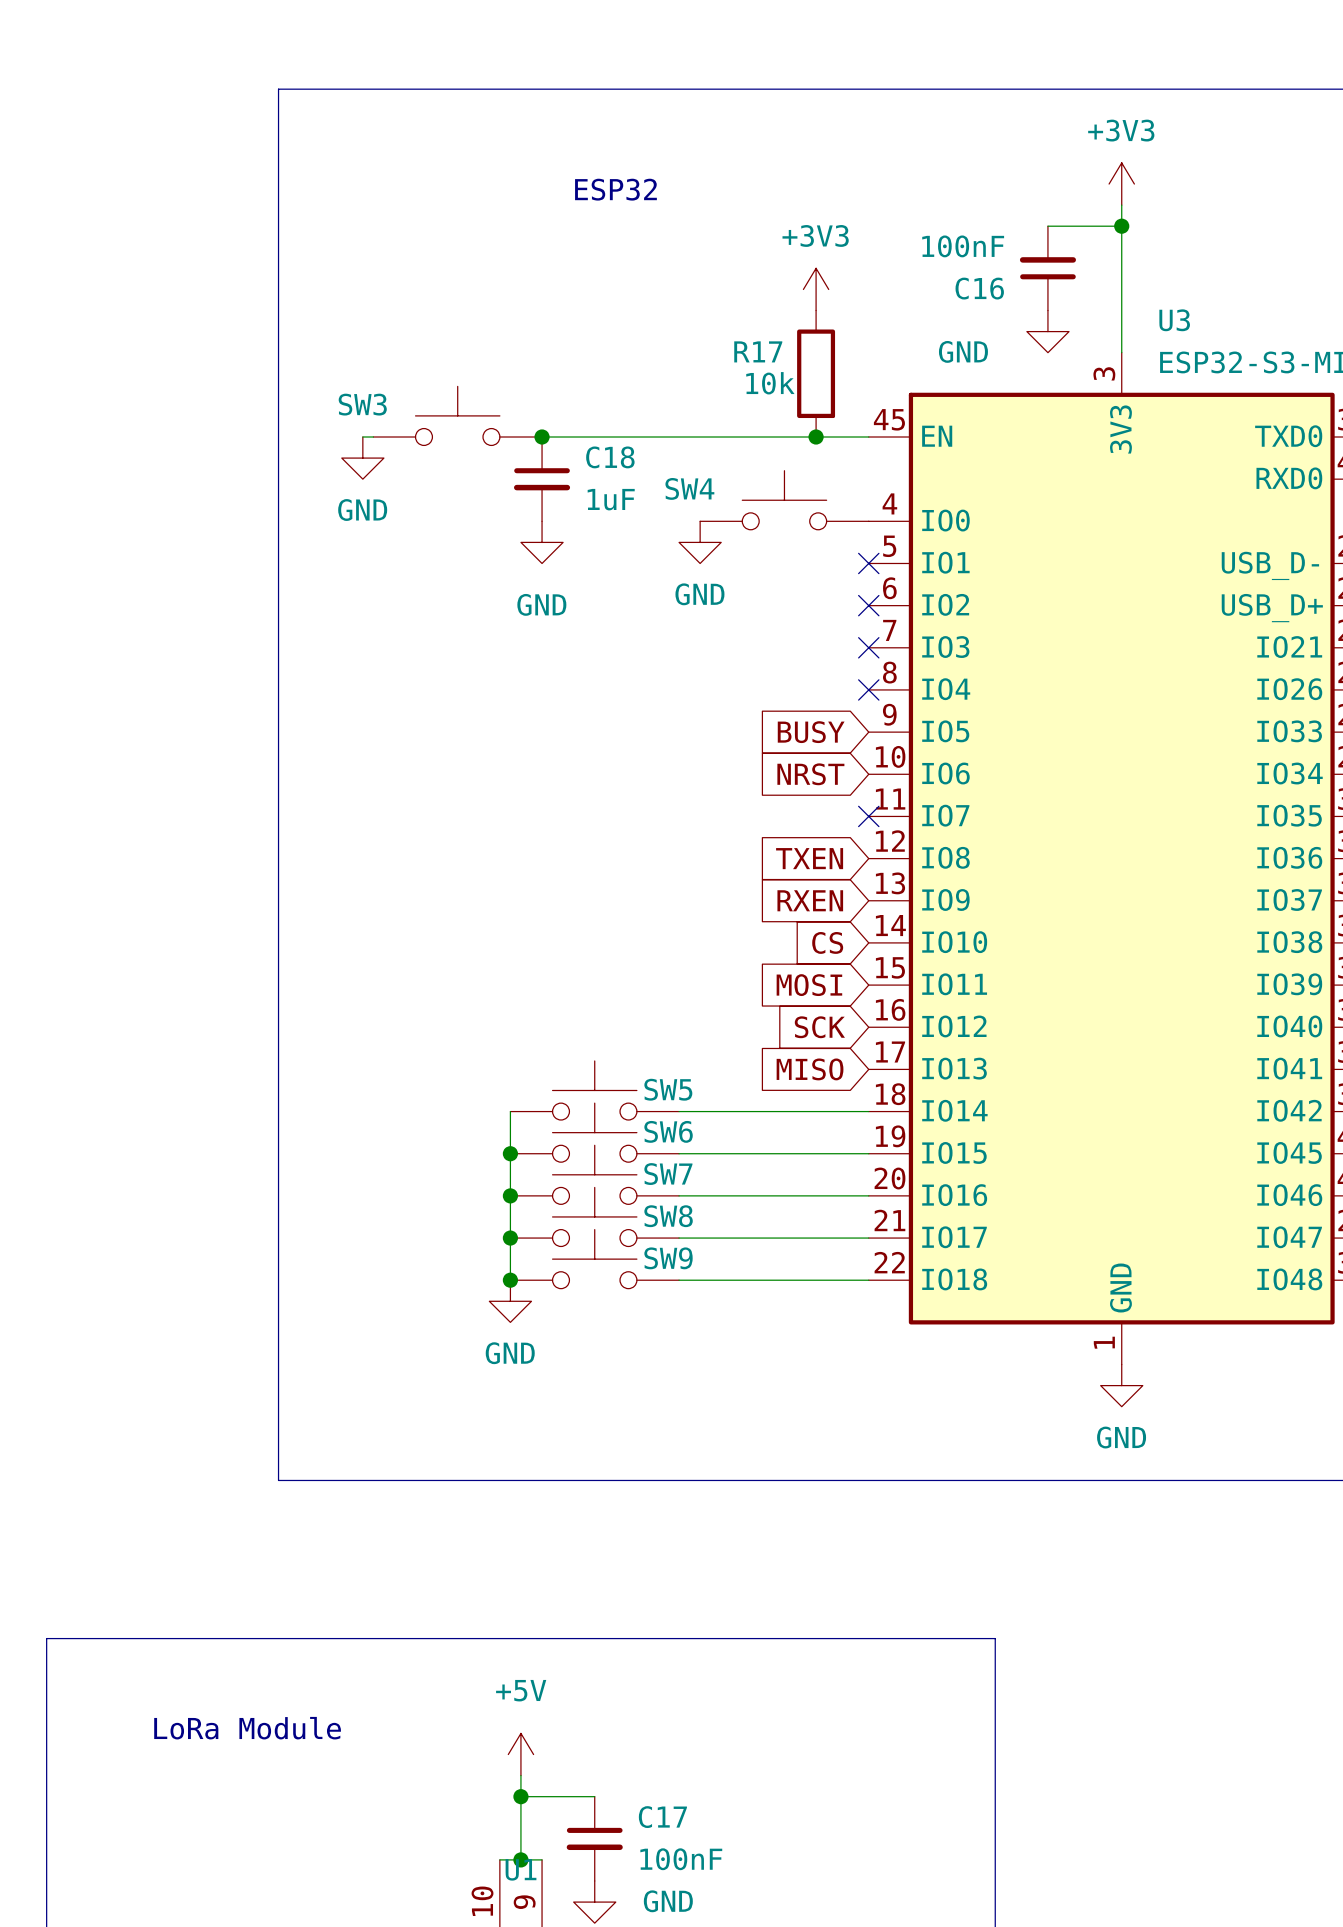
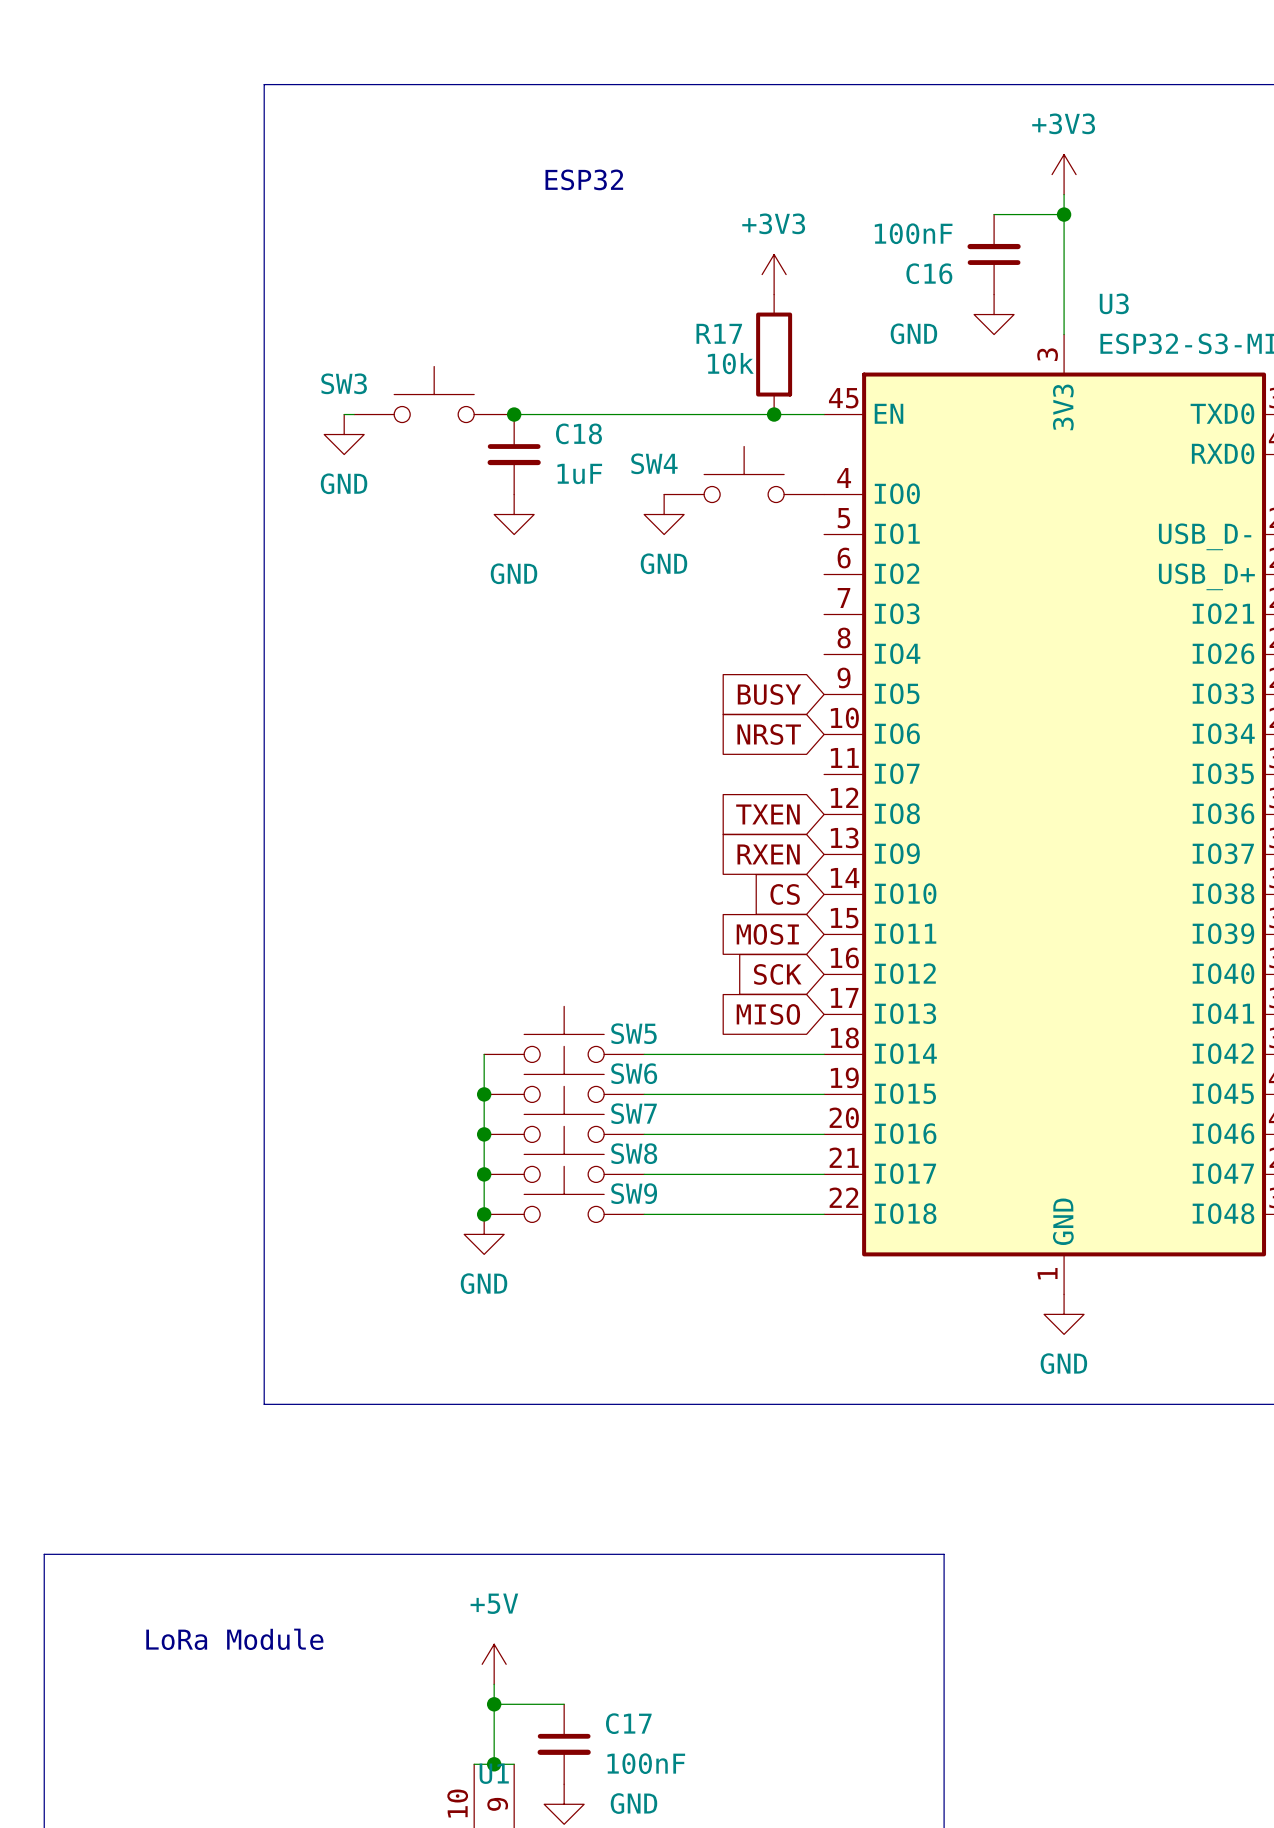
no-connect mark: (868, 563) -> none
no-connect mark: (868, 605) -> none
no-connect mark: (868, 647) -> none
no-connect mark: (868, 689) -> none
no-connect mark: (868, 816) -> none

